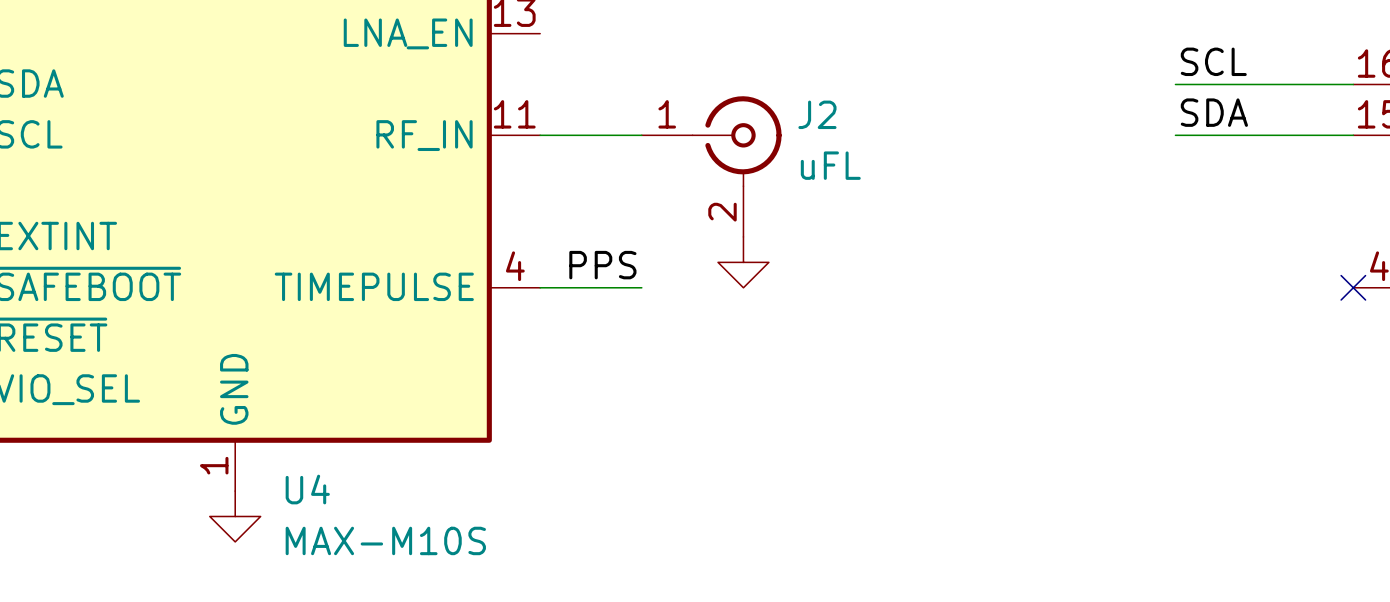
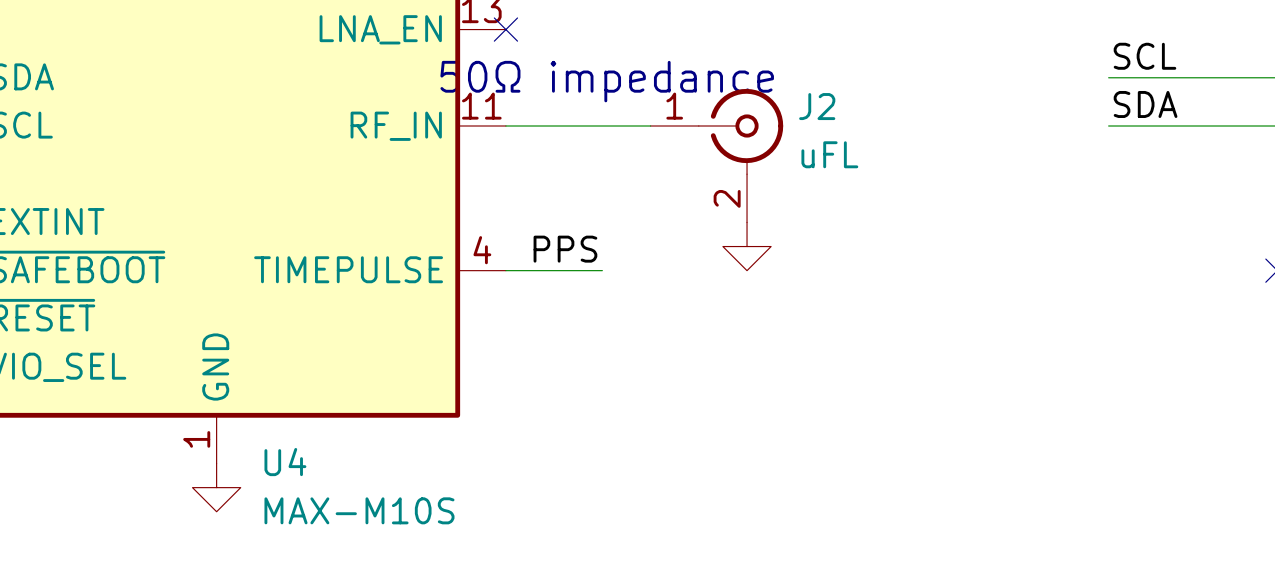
no-connect mark: none -> (505, 29)
text: none -> 50Ω impedance (607, 81)
J2 position: (711, 166) -> (716, 155)
power symbol position: (743, 262) -> (747, 246)

